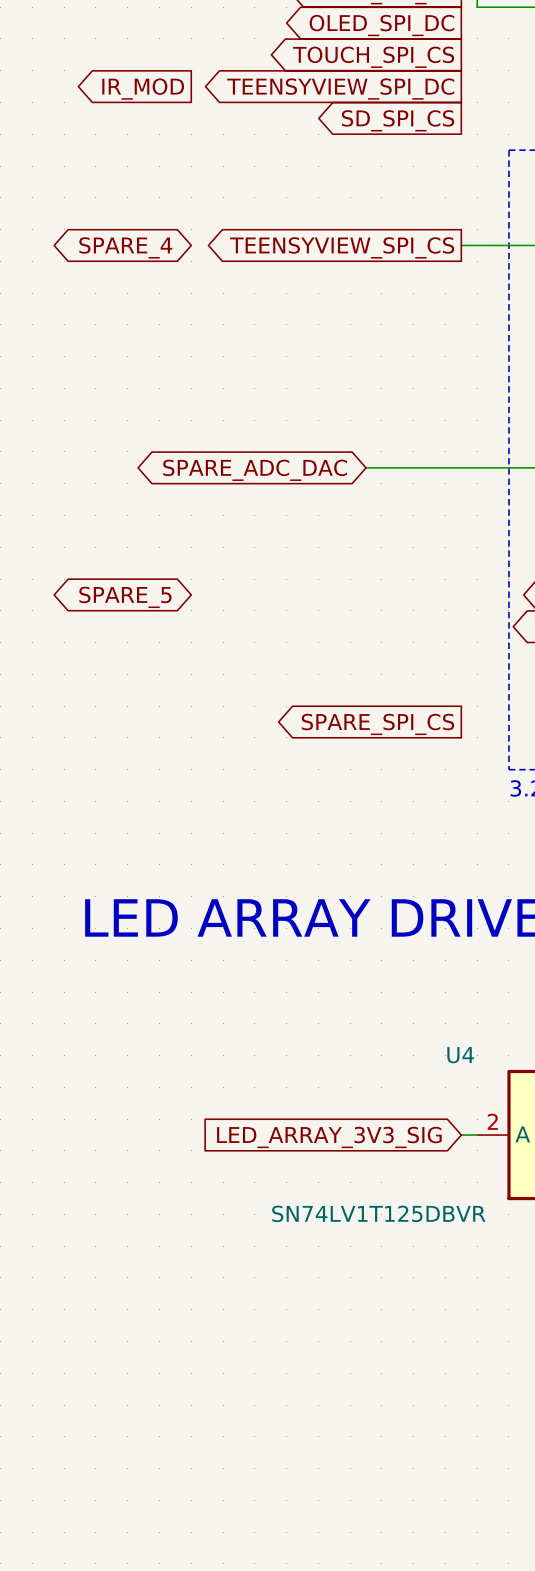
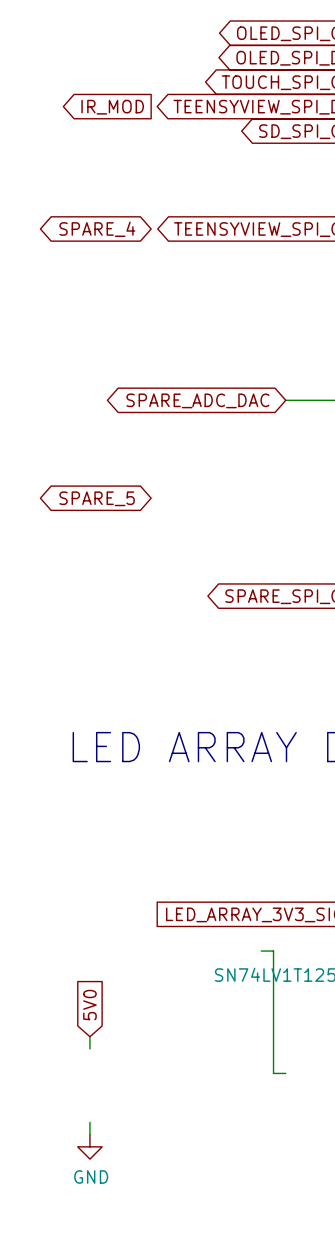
wire: none -> (261, 951) (273, 951) (273, 1073) (285, 1073)
global label: none -> 5V0 (89, 1005)
wire: none -> (89, 1036) (89, 1048)
wire: none -> (89, 1122) (89, 1134)
power symbol: none -> GND (89, 1146)

